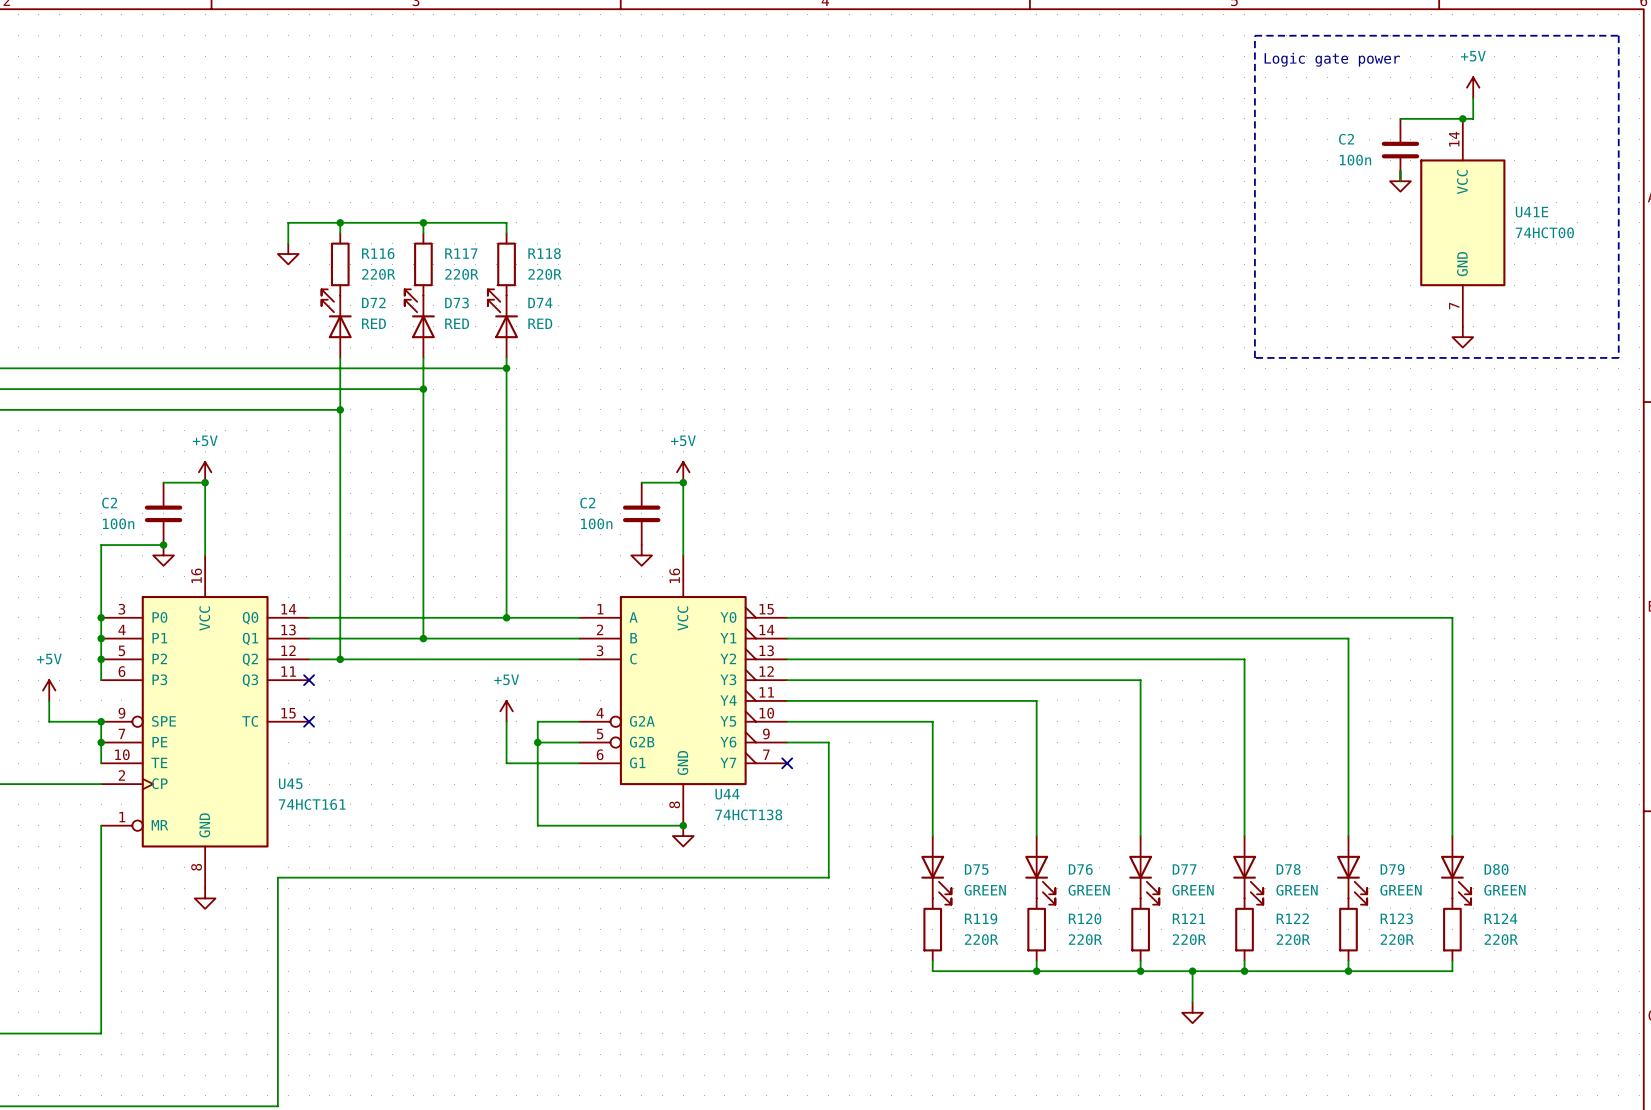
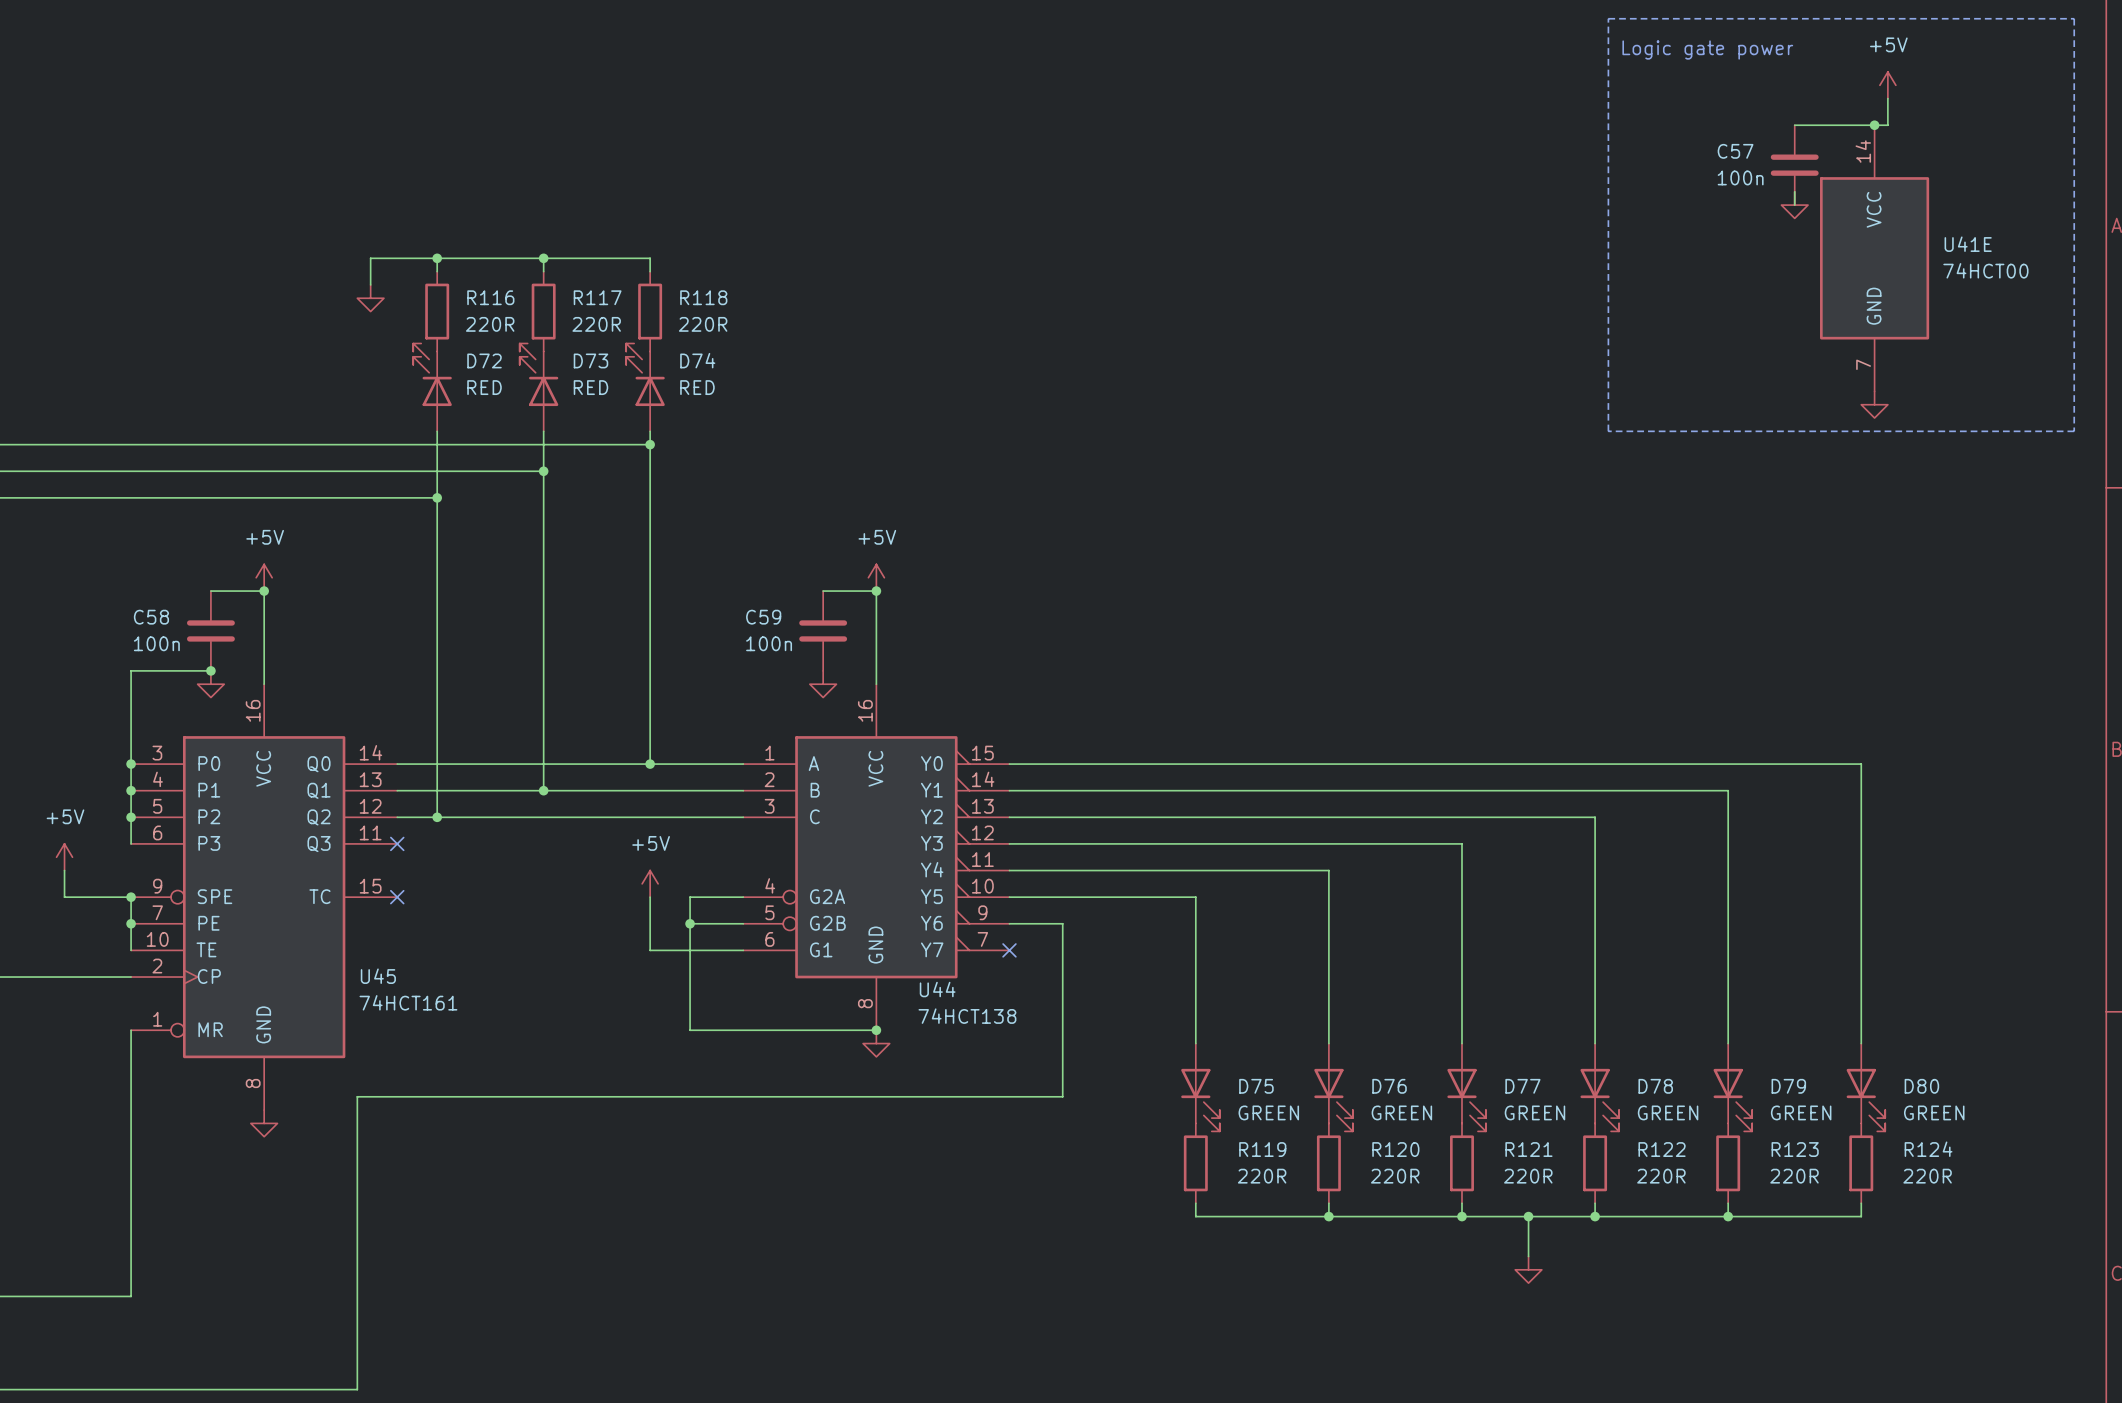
C2 name: C2 (1346, 139) -> C57 (1735, 151)
C2 name: C2 (109, 503) -> C58 (151, 617)
C2 name: C2 (587, 503) -> C59 (763, 617)

